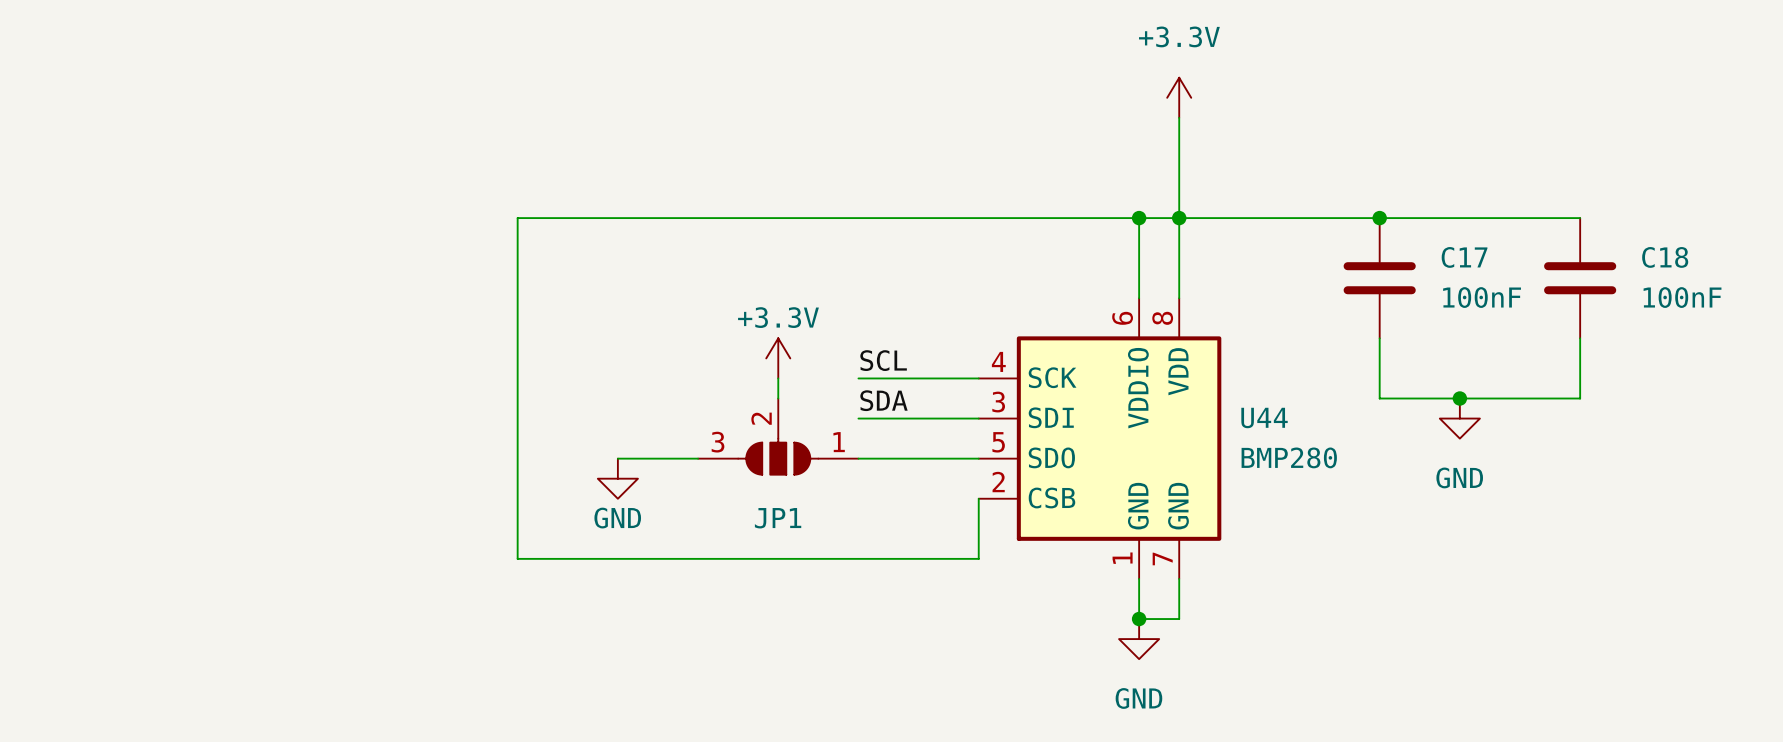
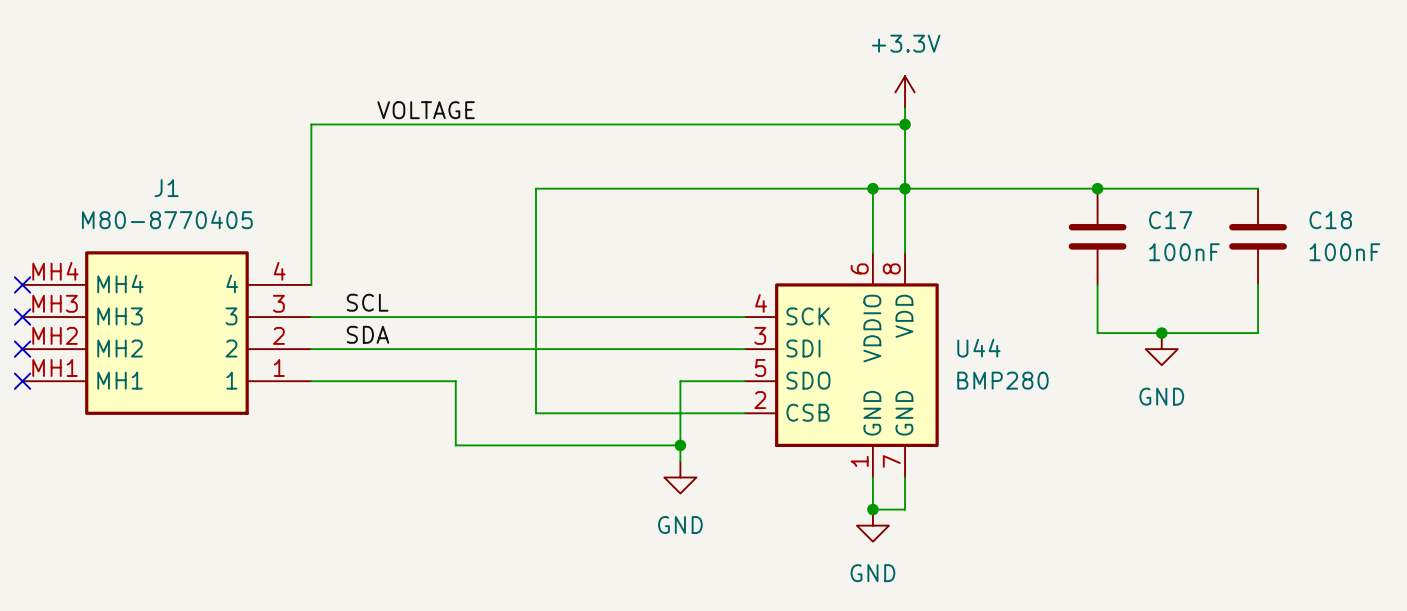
power symbol position: +3.3V (1179, 97) -> +3.3V (905, 92)
wire: none -> (905, 108) (905, 188)
wire: (1179, 117) (1179, 298) -> none
label: none -> VOLTAGE (426, 110)
wire: none -> (905, 124) (311, 124) (311, 284)
junction: none -> (905, 124)
wire: (678, 218) (517, 218) (517, 558) (978, 558) (978, 498) -> (536, 188) (536, 413) (744, 413)
wire: none -> (872, 188) (872, 252)
junction: none -> (872, 188)
junction: (1179, 218) -> none
no-connect mark: none -> (22, 284)
power symbol: +3.3V (778, 358) -> none
label: none -> SCL (367, 302)
label: SCL (883, 360) -> none
no-connect mark: none -> (22, 317)
wire: none -> (311, 317) (680, 317)
wire: (778, 378) (778, 398) -> none
J1: none -> M80-8770405 (166, 333)
label: none -> SDA (368, 334)
label: SDA (883, 400) -> none
no-connect mark: none -> (22, 349)
wire: none -> (311, 349) (680, 349)
JP1: (778, 436) -> none
U44 position: (1100, 438) -> (841, 365)
no-connect mark: none -> (22, 381)
wire: none -> (311, 381) (455, 381) (455, 445) (680, 445)
wire: (617, 458) (698, 458) -> none
wire: none -> (680, 381) (680, 461)
power symbol: GND (617, 478) -> none
junction: none -> (680, 445)
power symbol: none -> GND (680, 477)
wire: (1179, 578) (1179, 619) (1139, 619) -> (872, 477) (872, 509) (905, 509)
junction position: (1139, 619) -> (872, 509)
power symbol position: GND (1139, 639) -> GND (872, 525)

